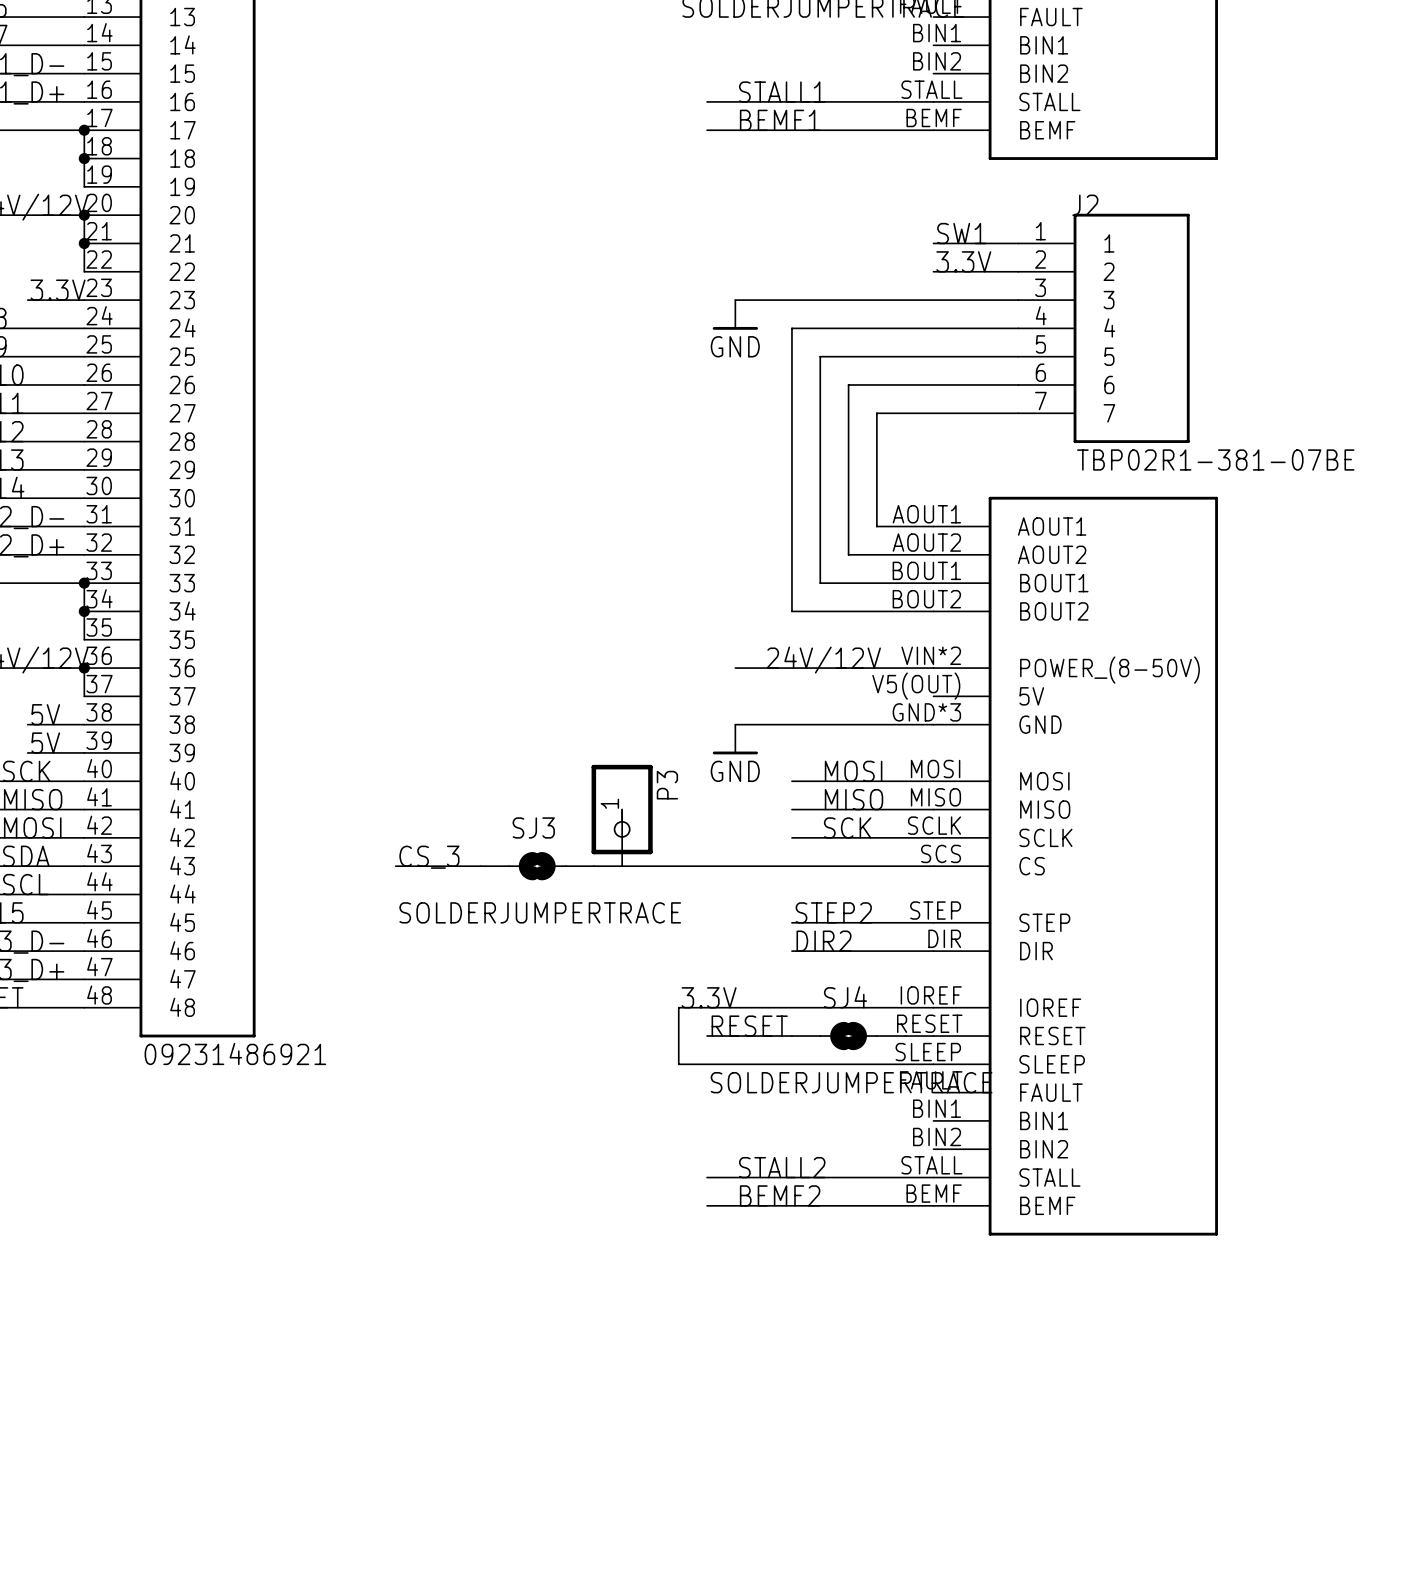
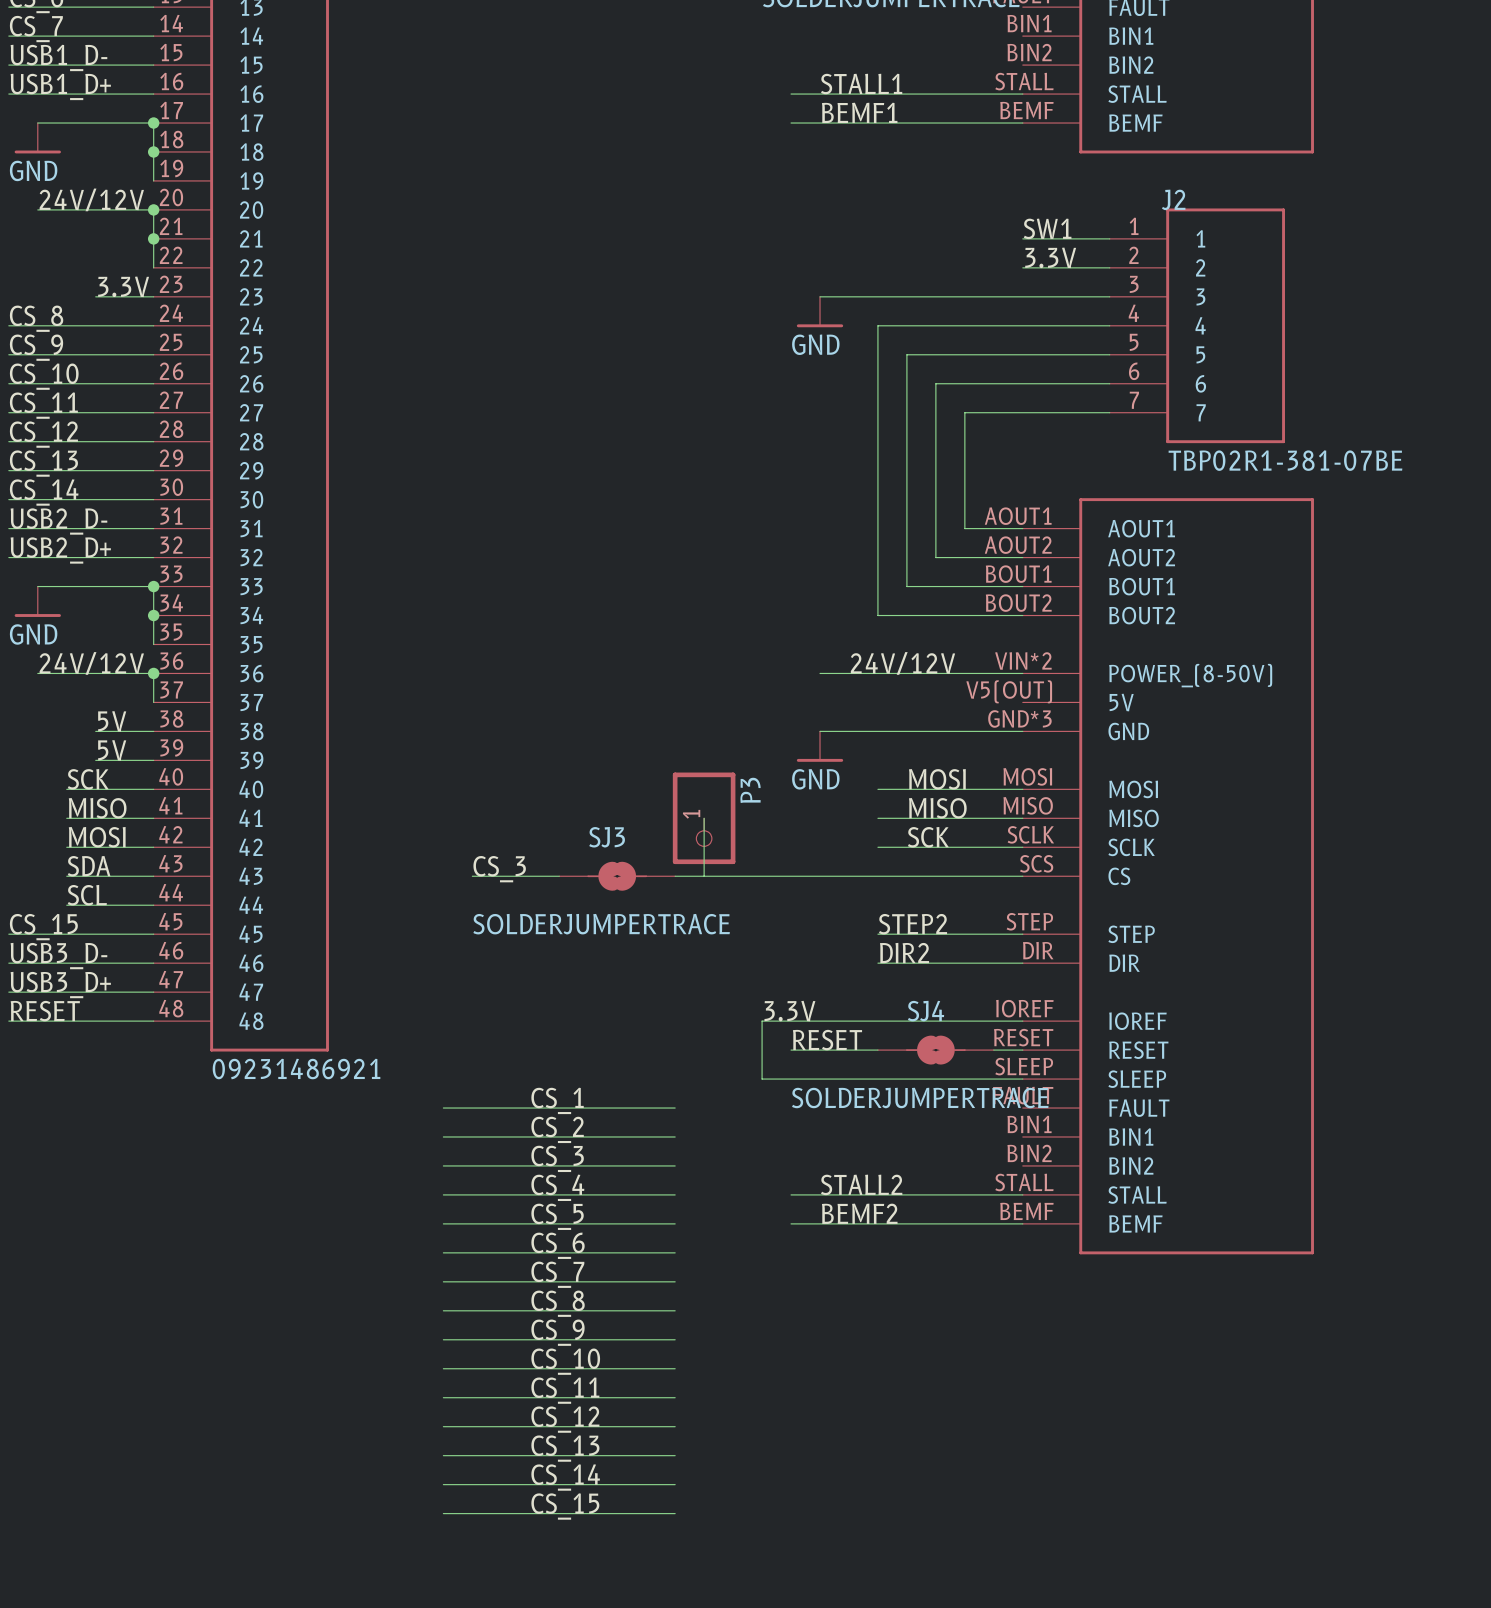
label: none -> CS_1 (557, 1100)
wire: none -> (443, 1108) (675, 1108)
label: none -> CS_2 (557, 1129)
wire: none -> (443, 1136) (675, 1136)
label: none -> CS_3 (557, 1158)
wire: none -> (443, 1165) (675, 1165)
label: none -> CS_4 (557, 1187)
wire: none -> (443, 1194) (675, 1194)
label: none -> CS_5 (557, 1216)
wire: none -> (443, 1223) (675, 1223)
label: none -> CS_6 (558, 1245)
wire: none -> (443, 1252) (675, 1252)
label: none -> CS_7 (557, 1274)
wire: none -> (443, 1281) (675, 1281)
label: none -> CS_8 (558, 1303)
wire: none -> (443, 1310) (675, 1310)
label: none -> CS_9 (557, 1332)
wire: none -> (443, 1339) (675, 1339)
label: none -> CS_10 (565, 1361)
wire: none -> (443, 1368) (675, 1368)
label: none -> CS_11 (565, 1390)
wire: none -> (443, 1397) (675, 1397)
label: none -> CS_12 (565, 1419)
wire: none -> (443, 1426) (675, 1426)
label: none -> CS_13 (565, 1448)
wire: none -> (443, 1455) (675, 1455)
label: none -> CS_14 (565, 1477)
wire: none -> (443, 1484) (675, 1484)
label: none -> CS_15 (565, 1506)
wire: none -> (443, 1513) (675, 1513)

